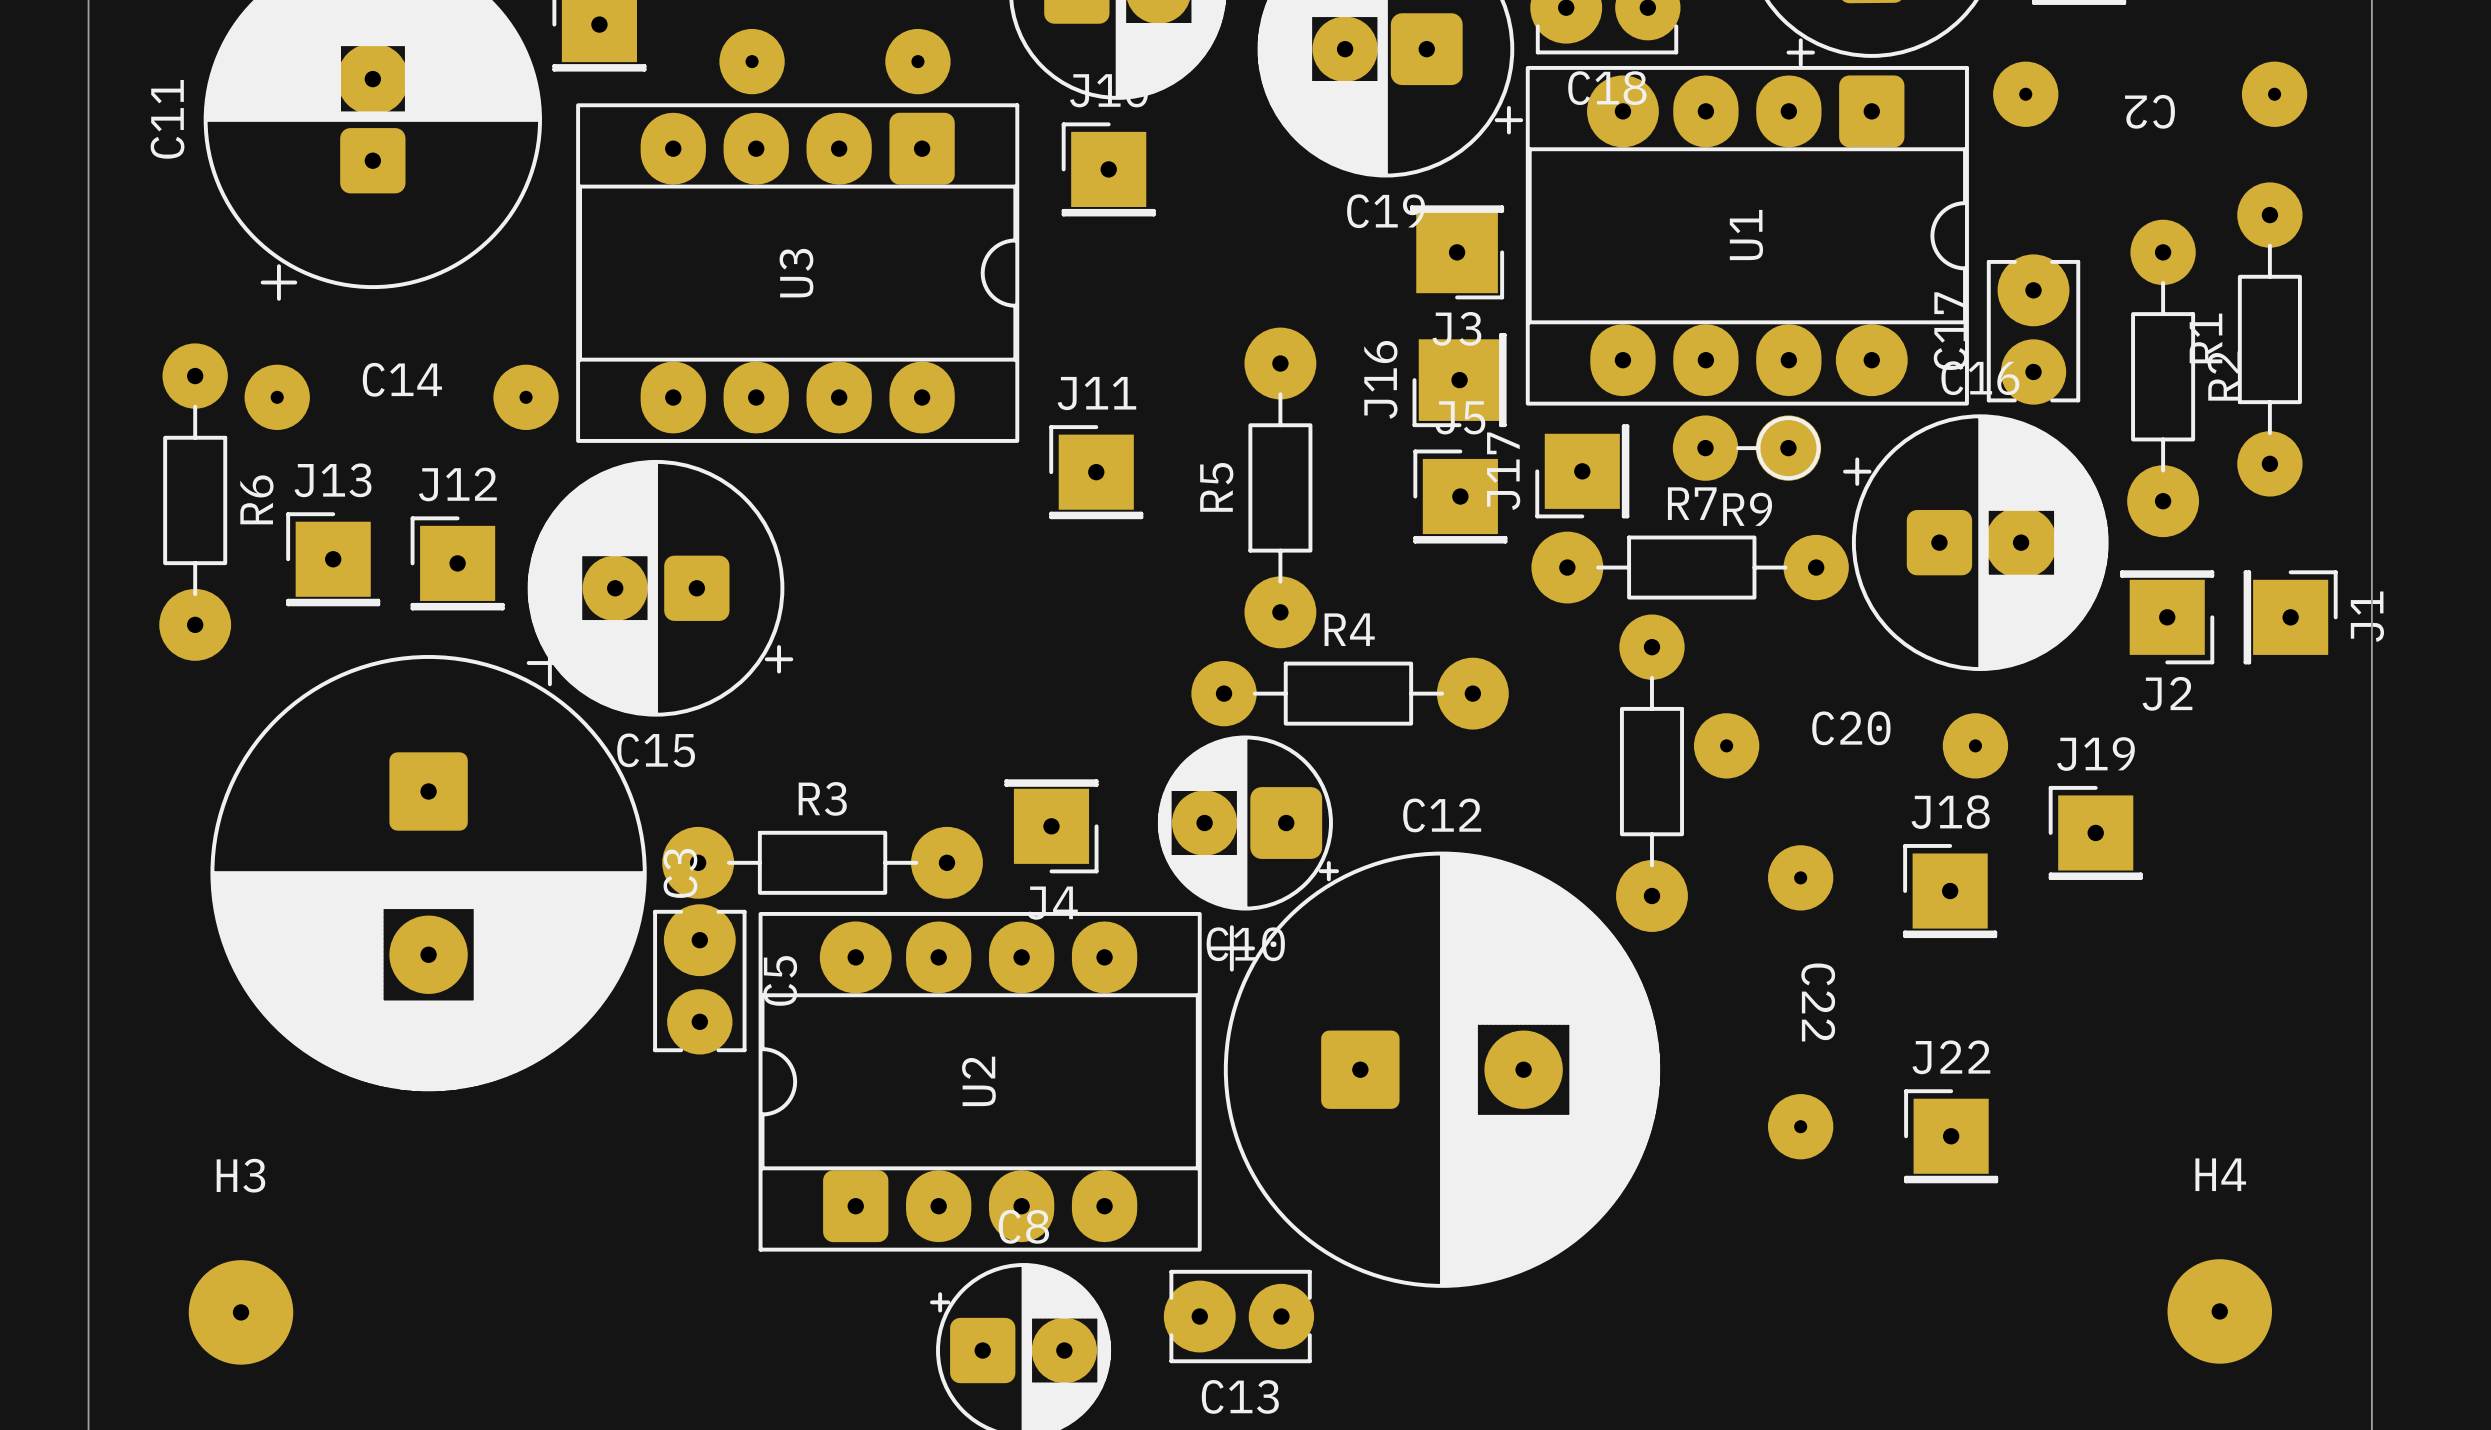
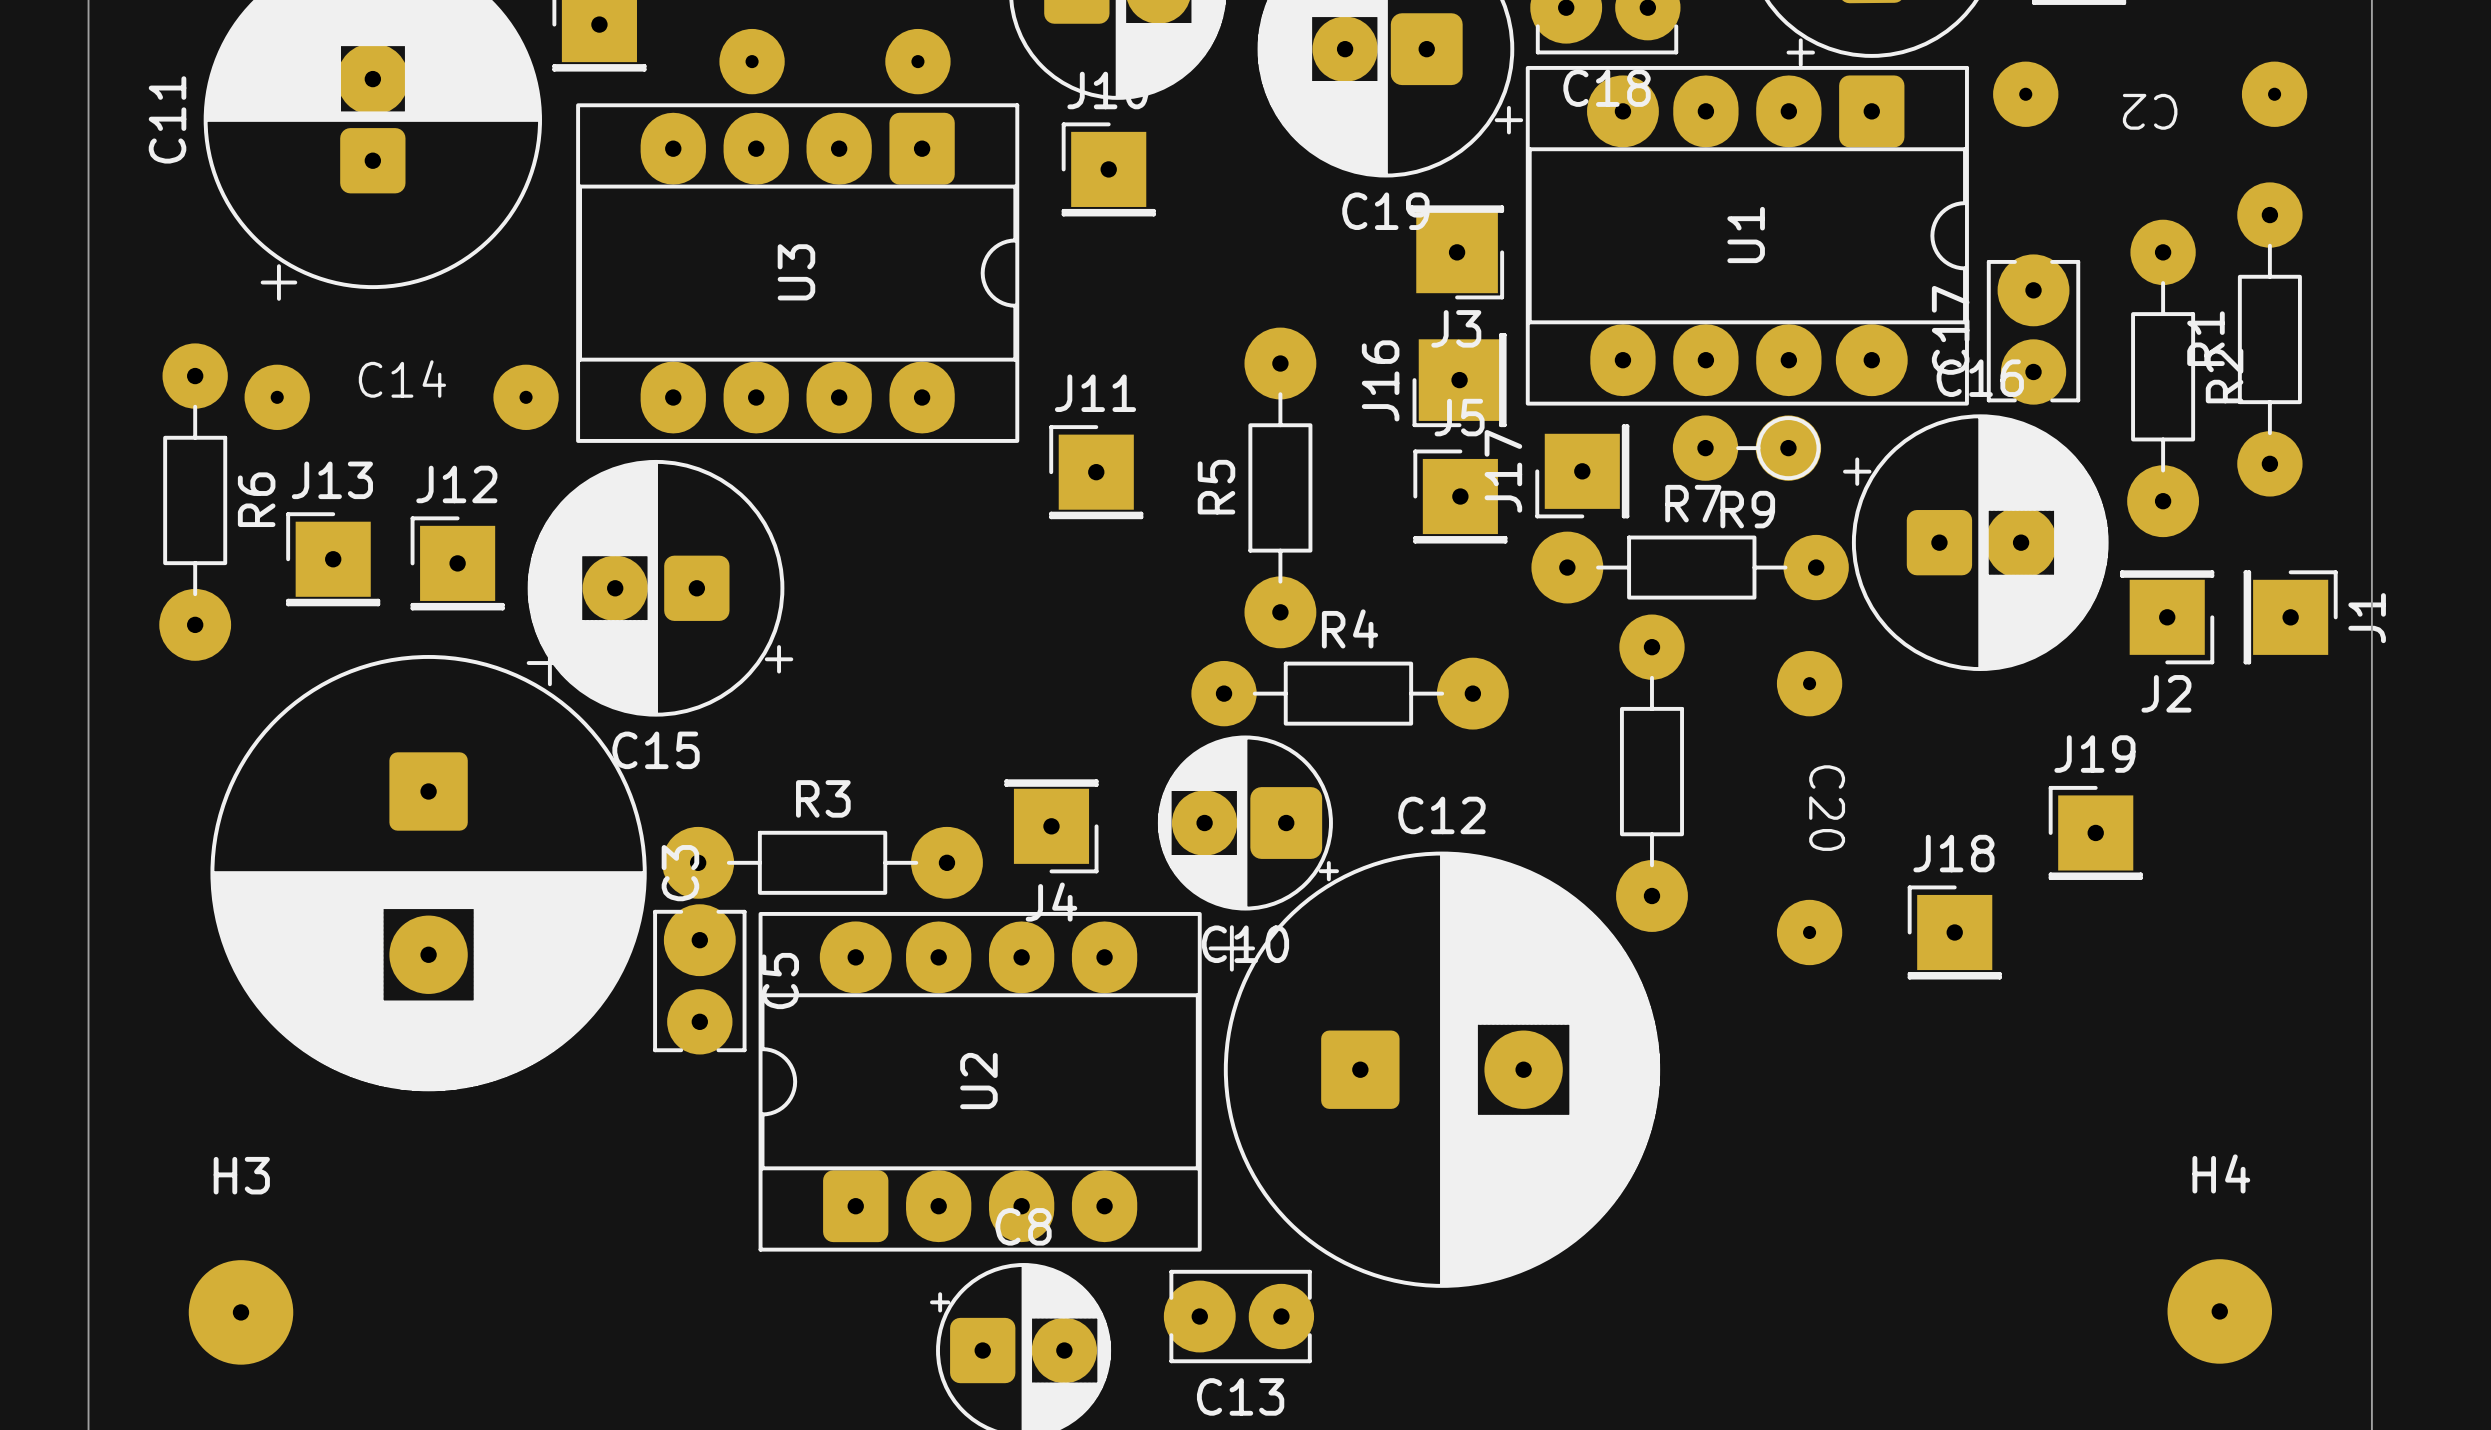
C20 rotation: 0° (1851, 745) -> 90° clockwise (1809, 808)
J18 position: (1950, 891) -> (1954, 932)
C22: (1800, 1002) -> none
J22: (1951, 1136) -> none

